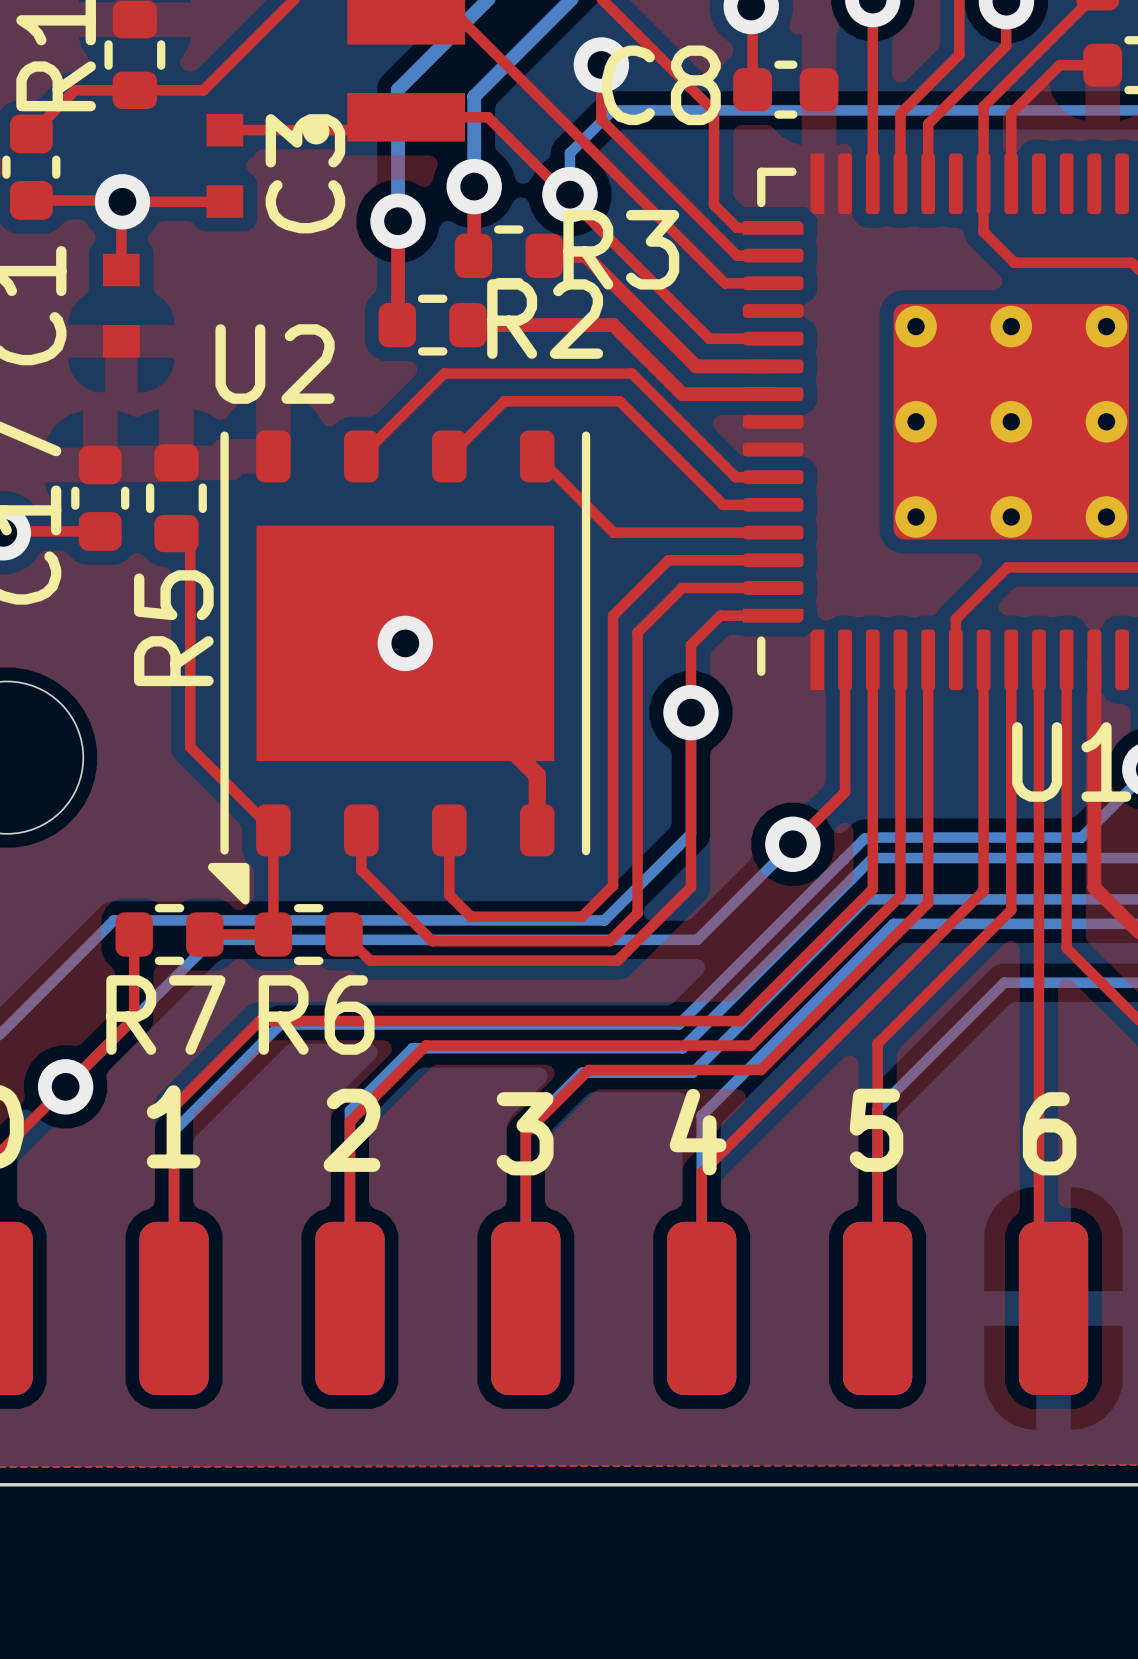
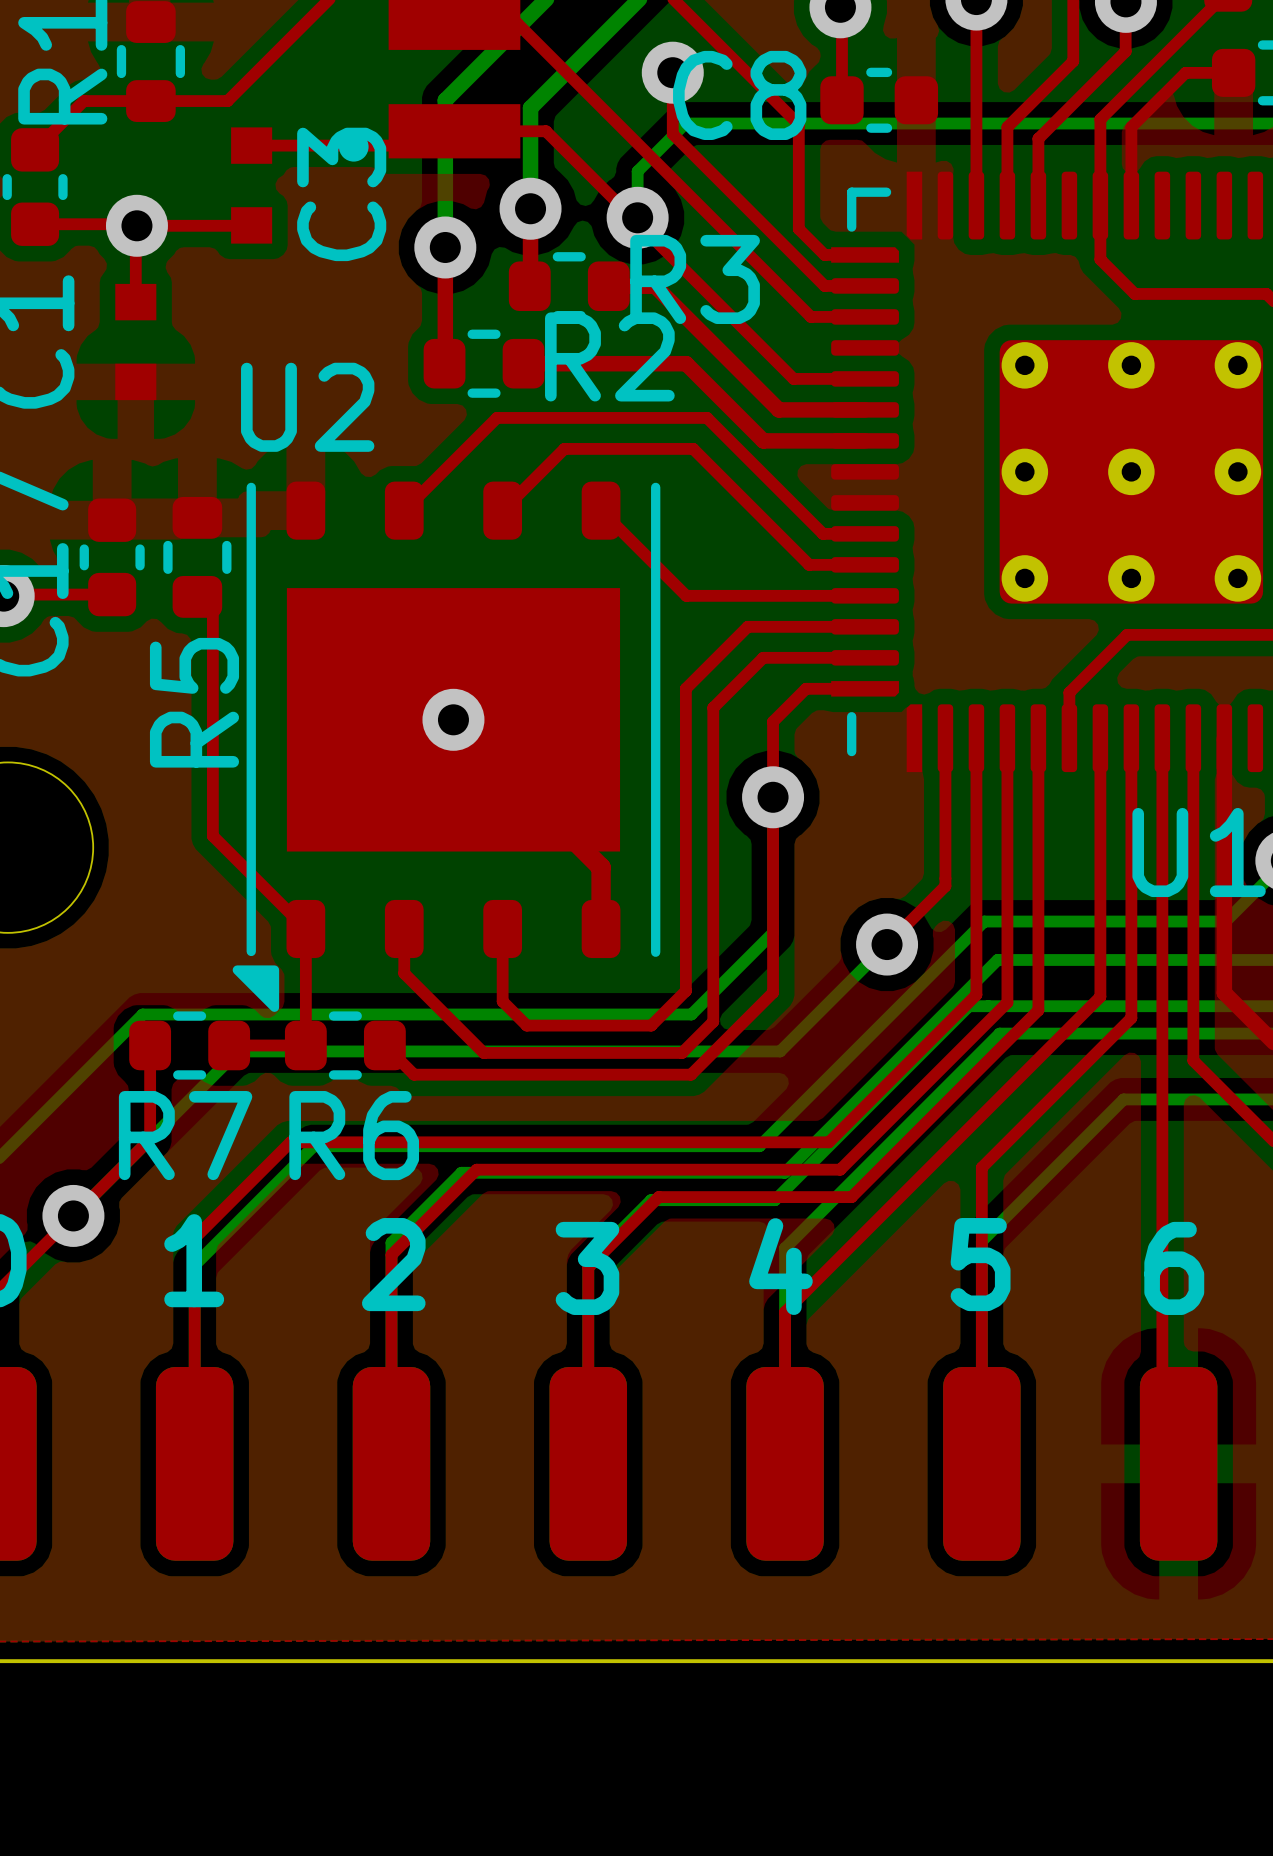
bottom track: (1095, 823) (1081, 837) (864, 838) -> (1225, 921) (984, 921) (967, 938)
bottom track: (891, 858) (872, 858) (682, 1048) -> (997, 959) (784, 1172) (763, 1172)
bottom track: (618, 906) (604, 920) (113, 920) -> (691, 1014) (142, 1014) (127, 1029)

